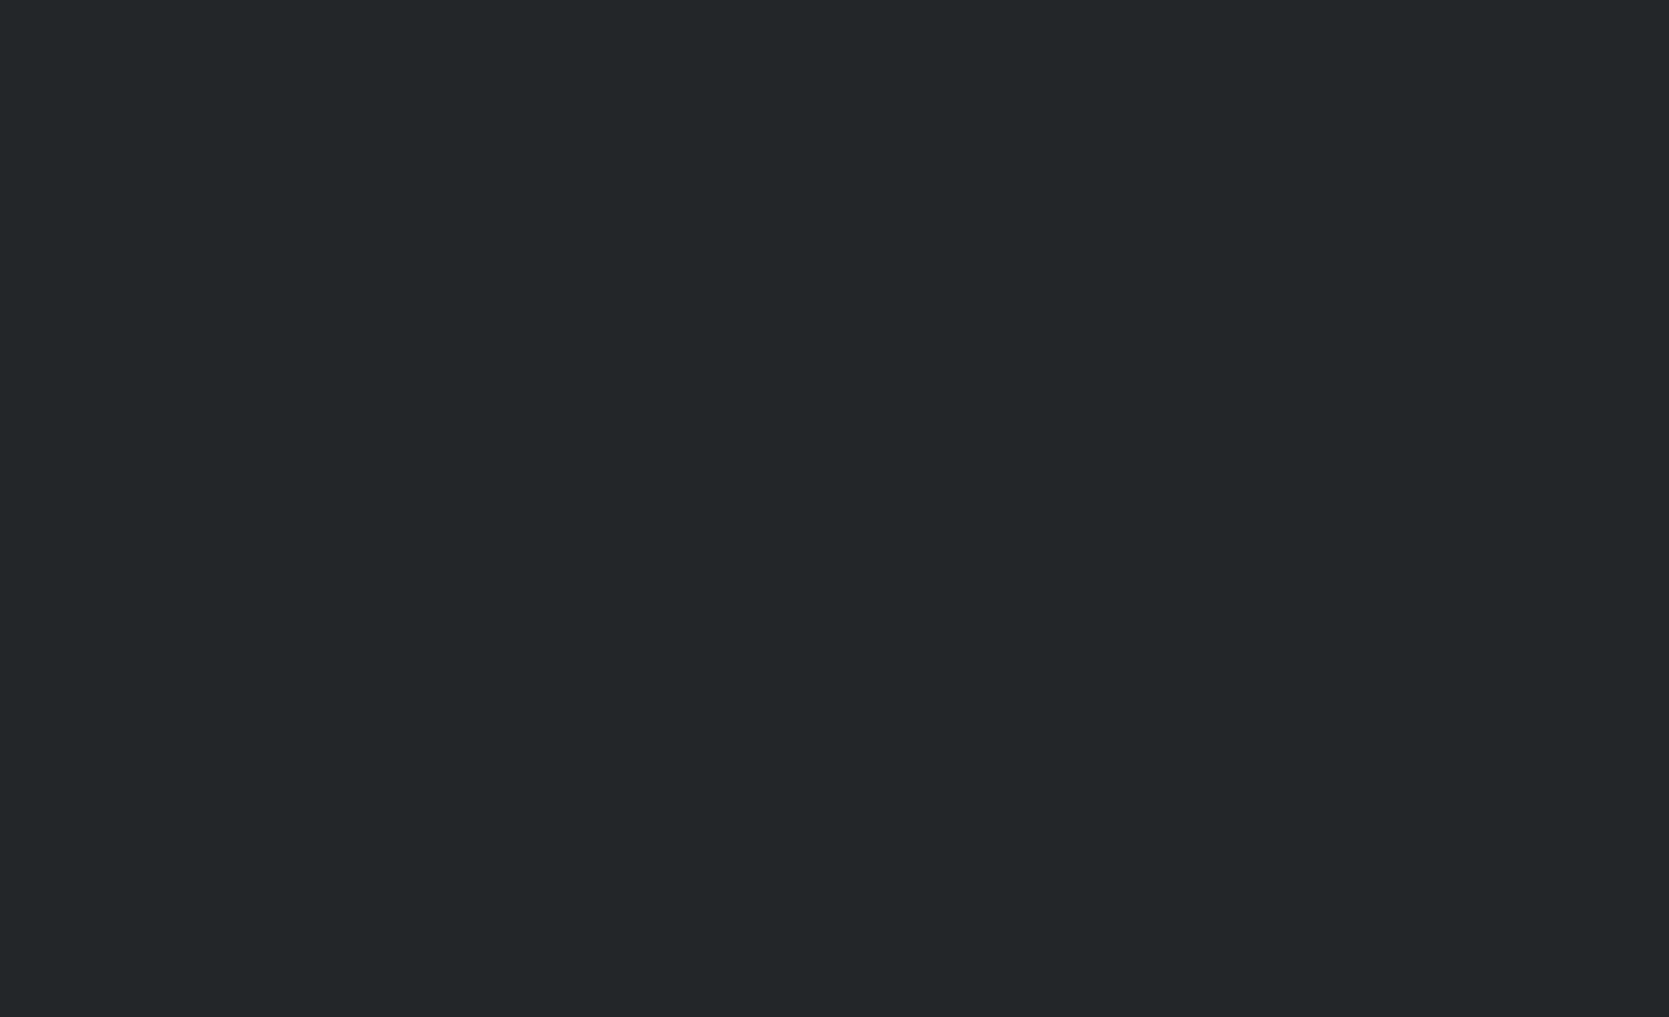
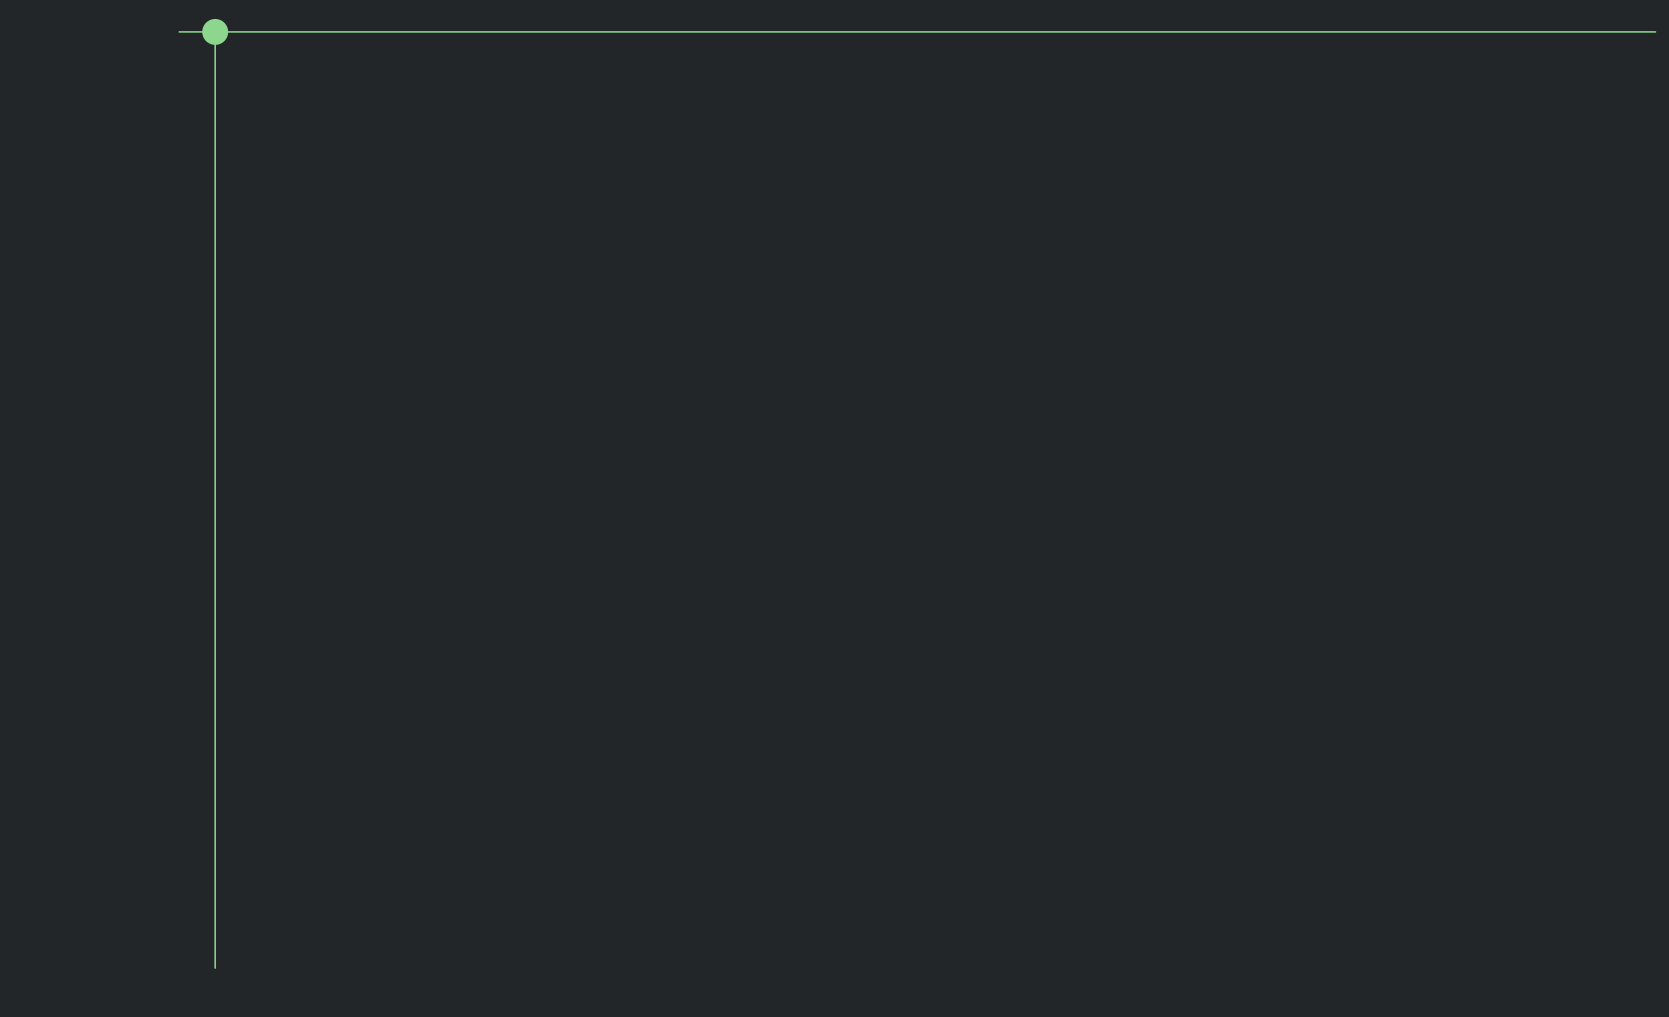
wire: none -> (179, 31) (1655, 31)
wire: none -> (215, 31) (215, 968)
junction: none -> (215, 31)

